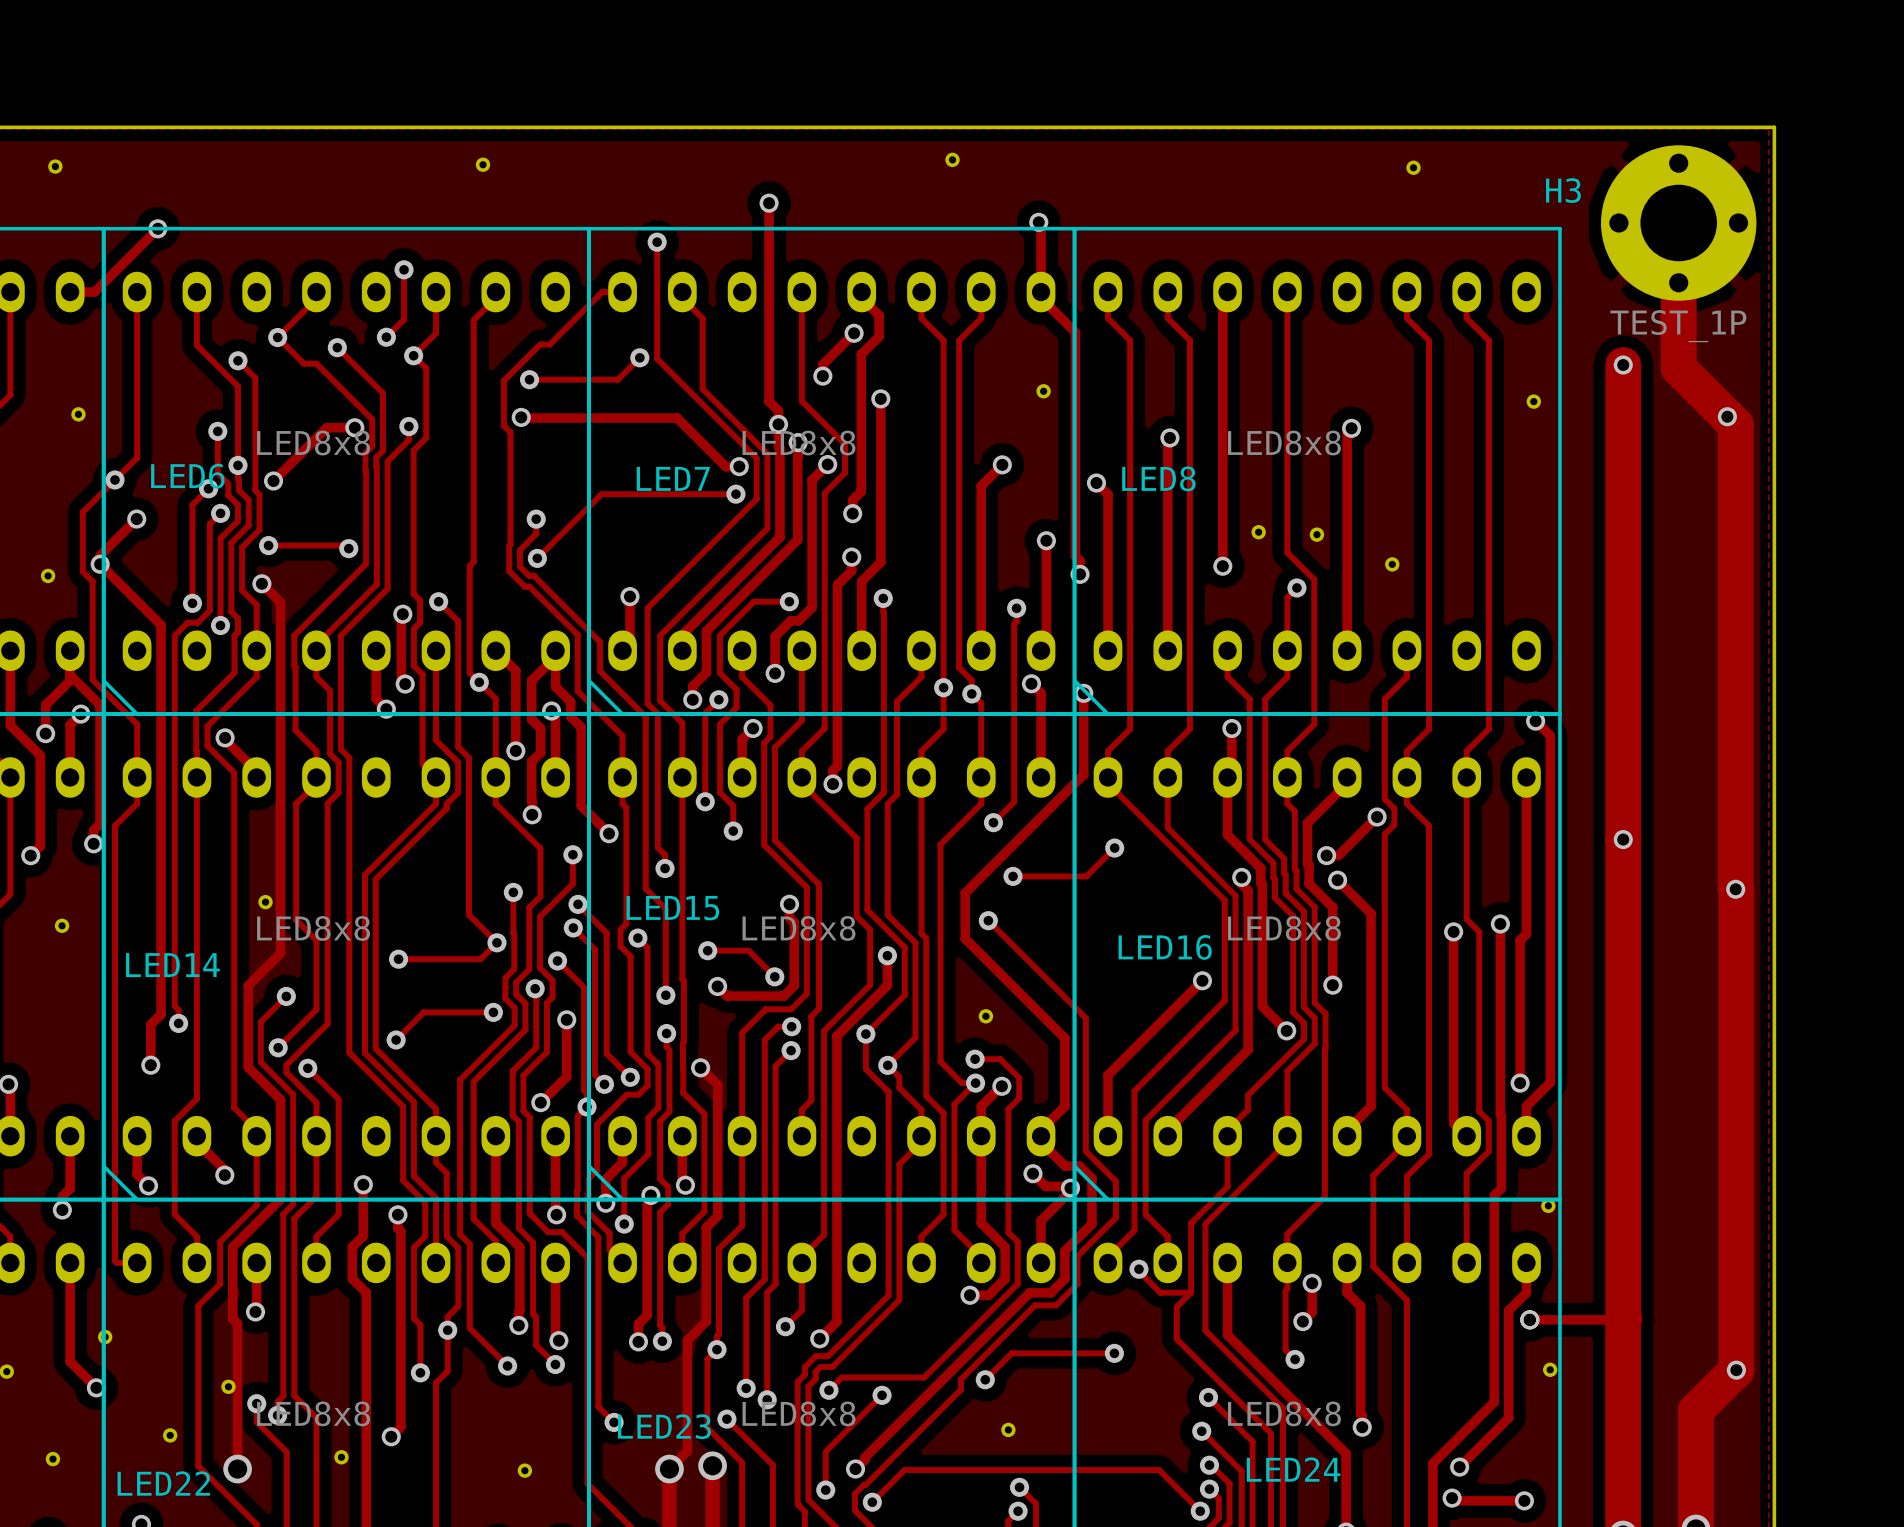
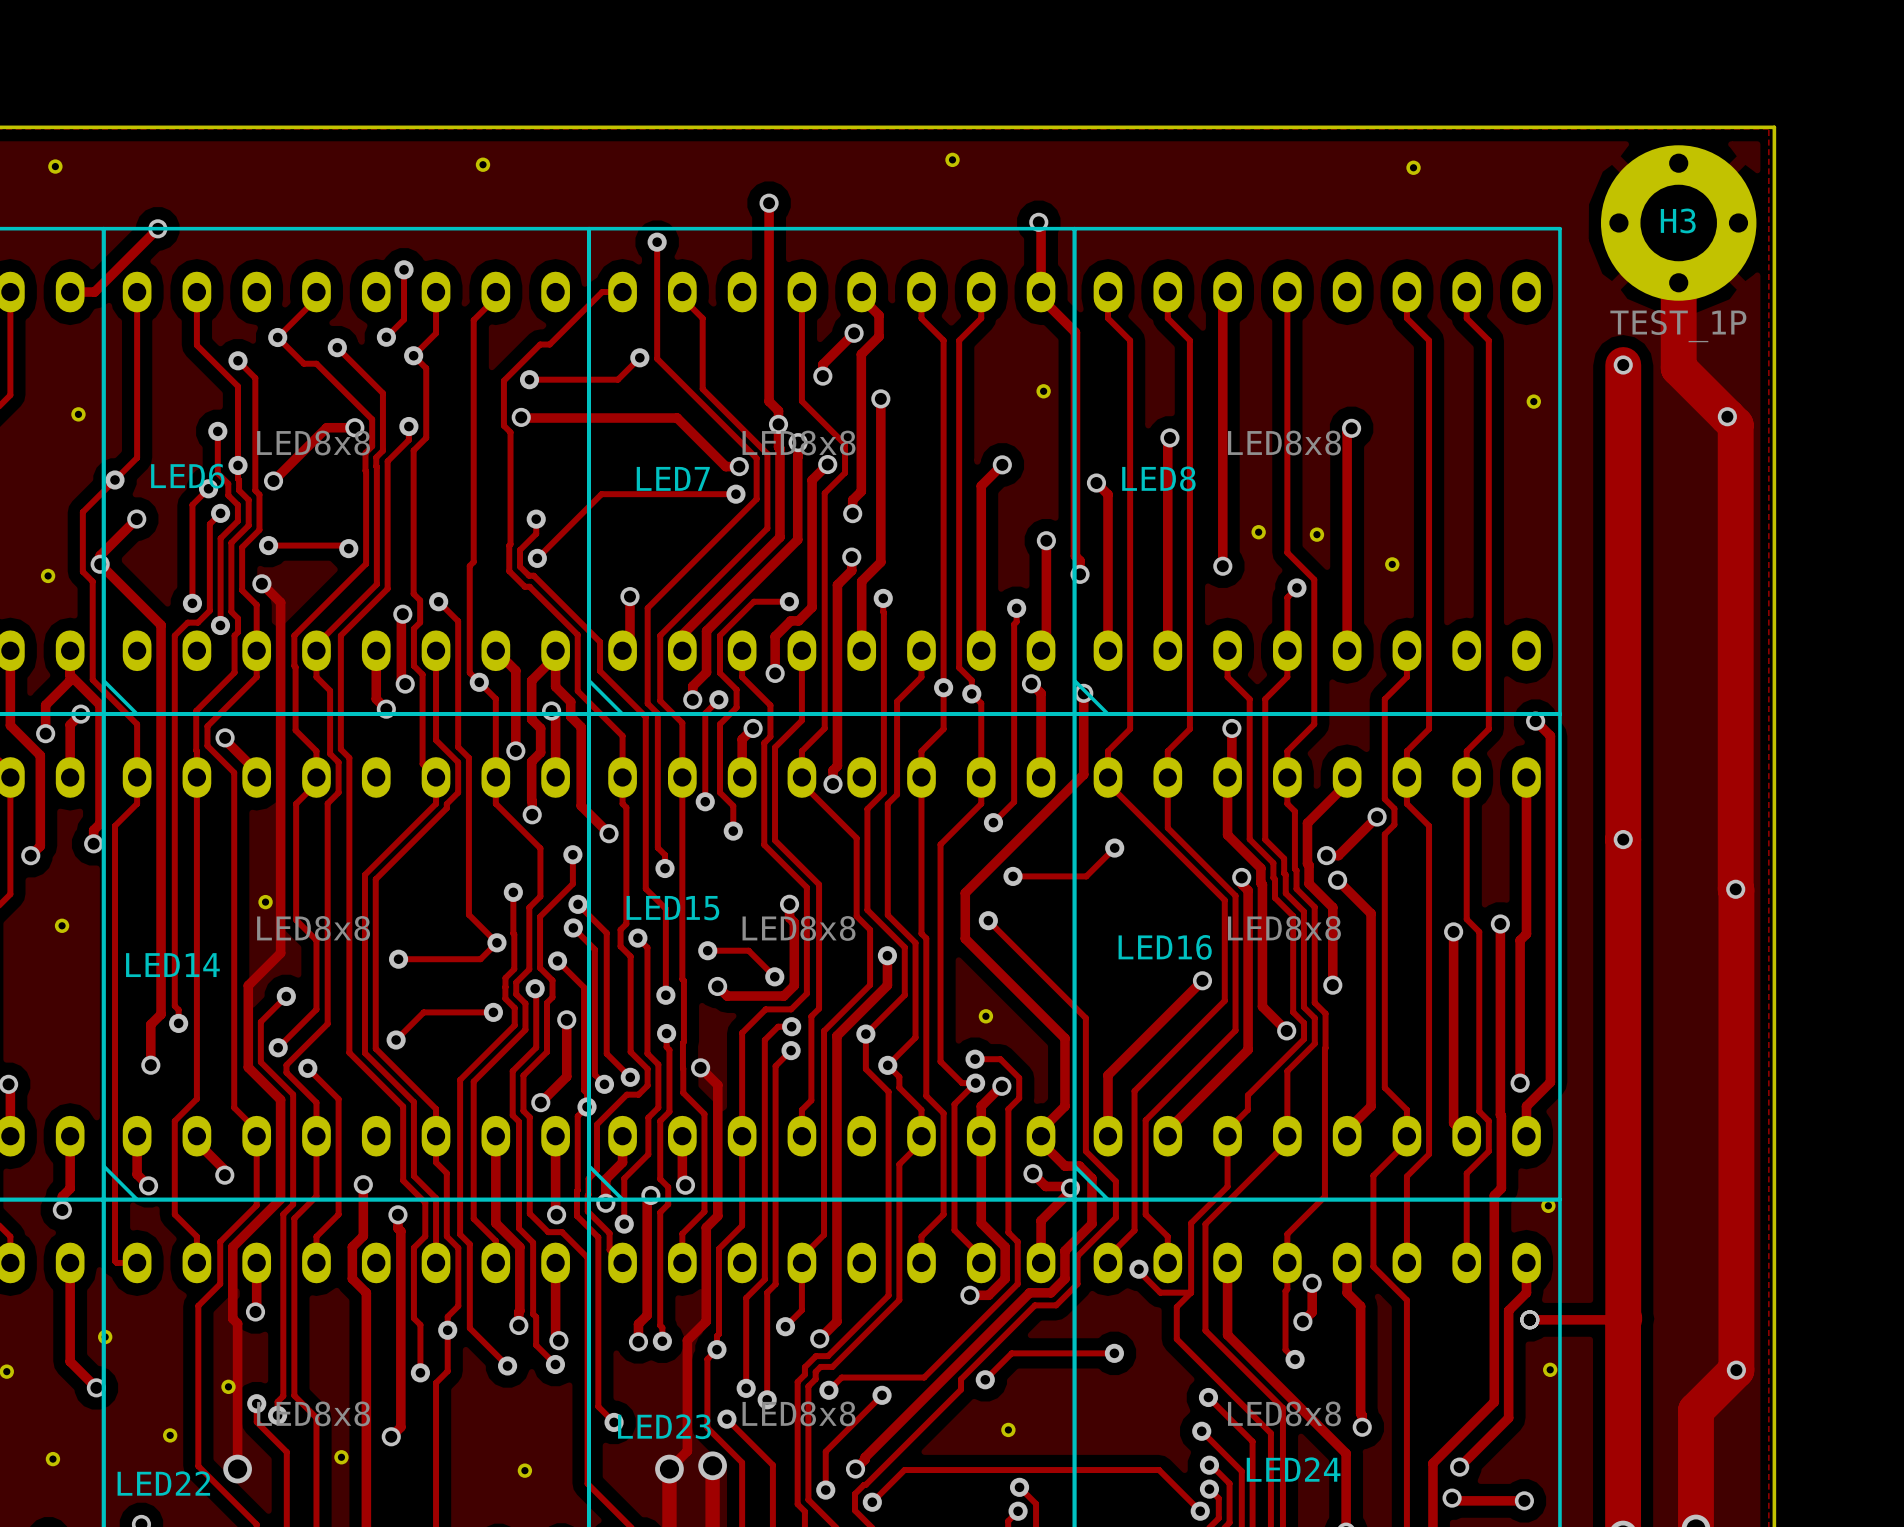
H3 name position: H3 (1563, 190) -> H3 (1678, 220)

